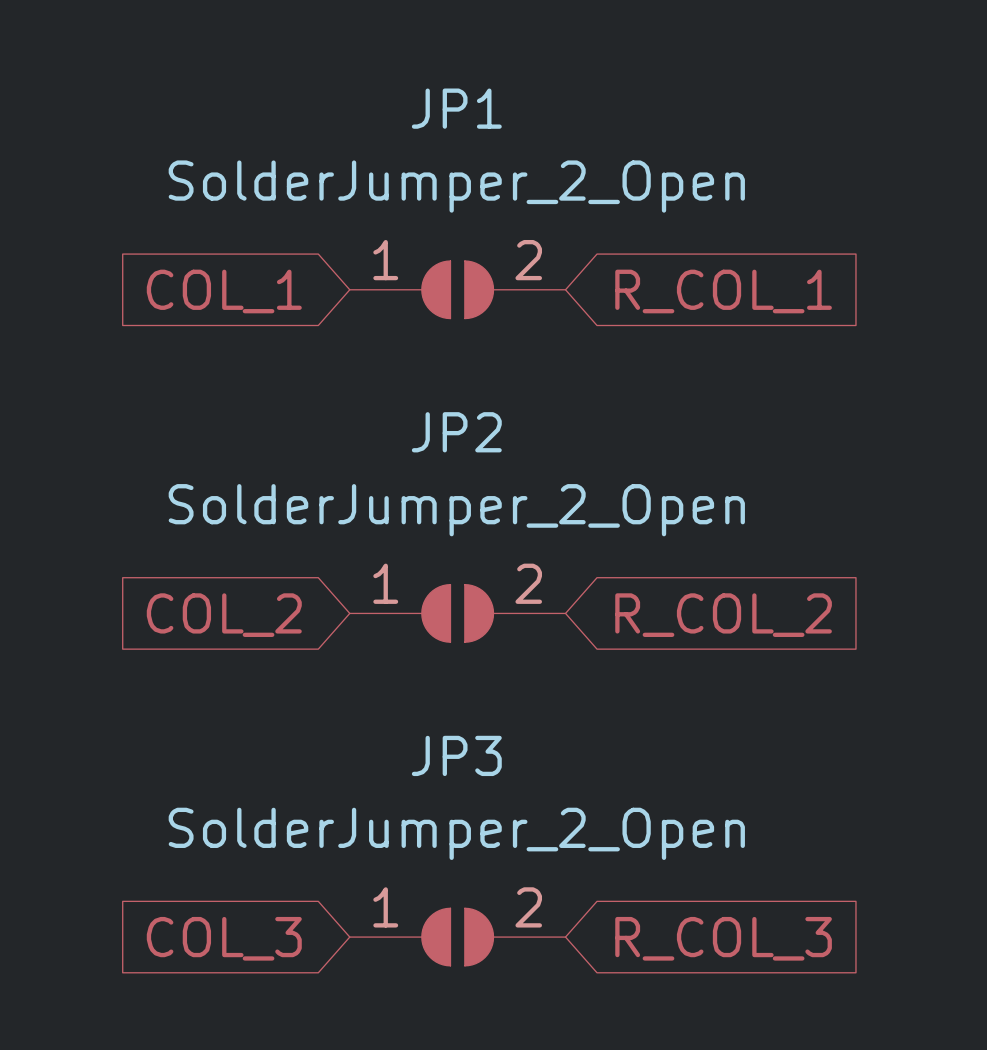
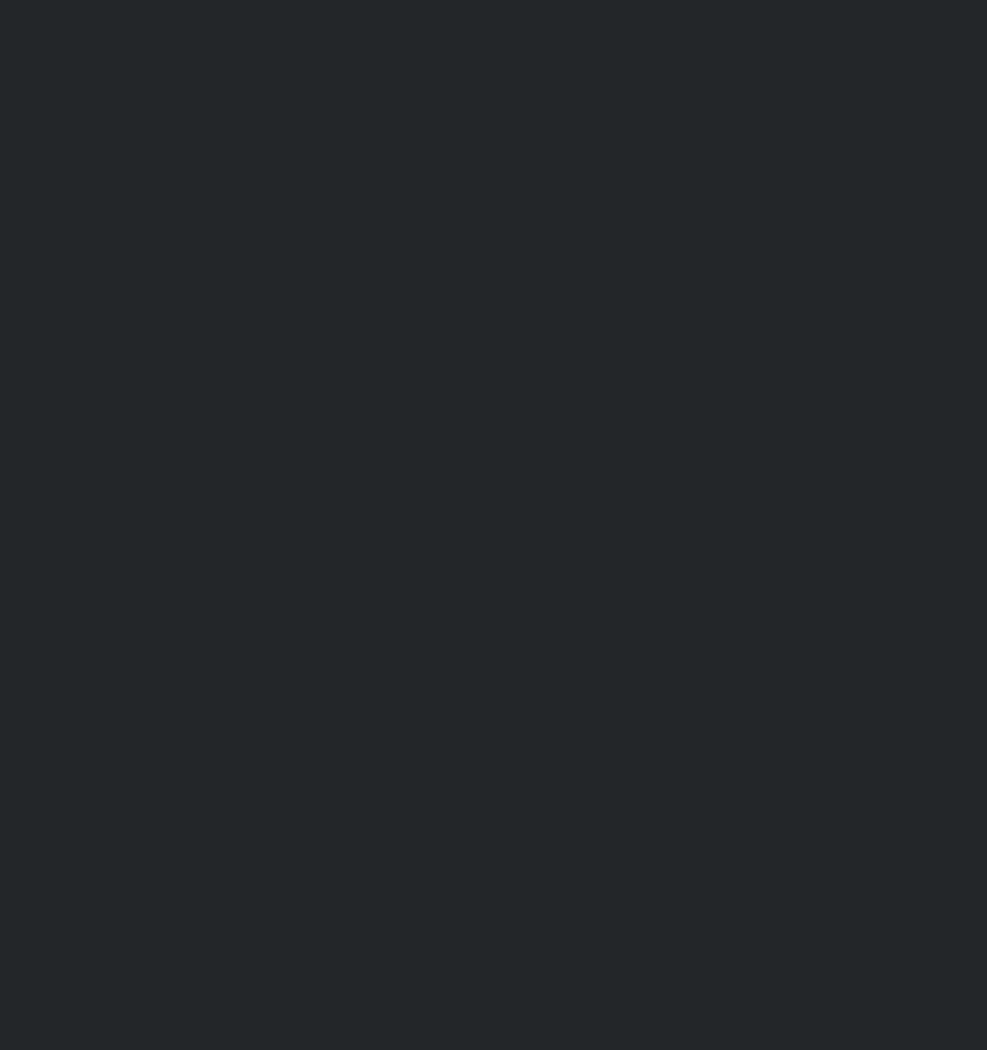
JP1: SolderJumper_2_Open (457, 289) -> none
global label: COL_1 (224, 291) -> none
global label: R_COL_1 (723, 291) -> none
JP2: SolderJumper_2_Open (457, 613) -> none
global label: COL_2 (224, 615) -> none
global label: R_COL_2 (723, 615) -> none
JP3: SolderJumper_2_Open (457, 937) -> none
global label: COL_3 (224, 938) -> none
global label: R_COL_3 (723, 938) -> none

